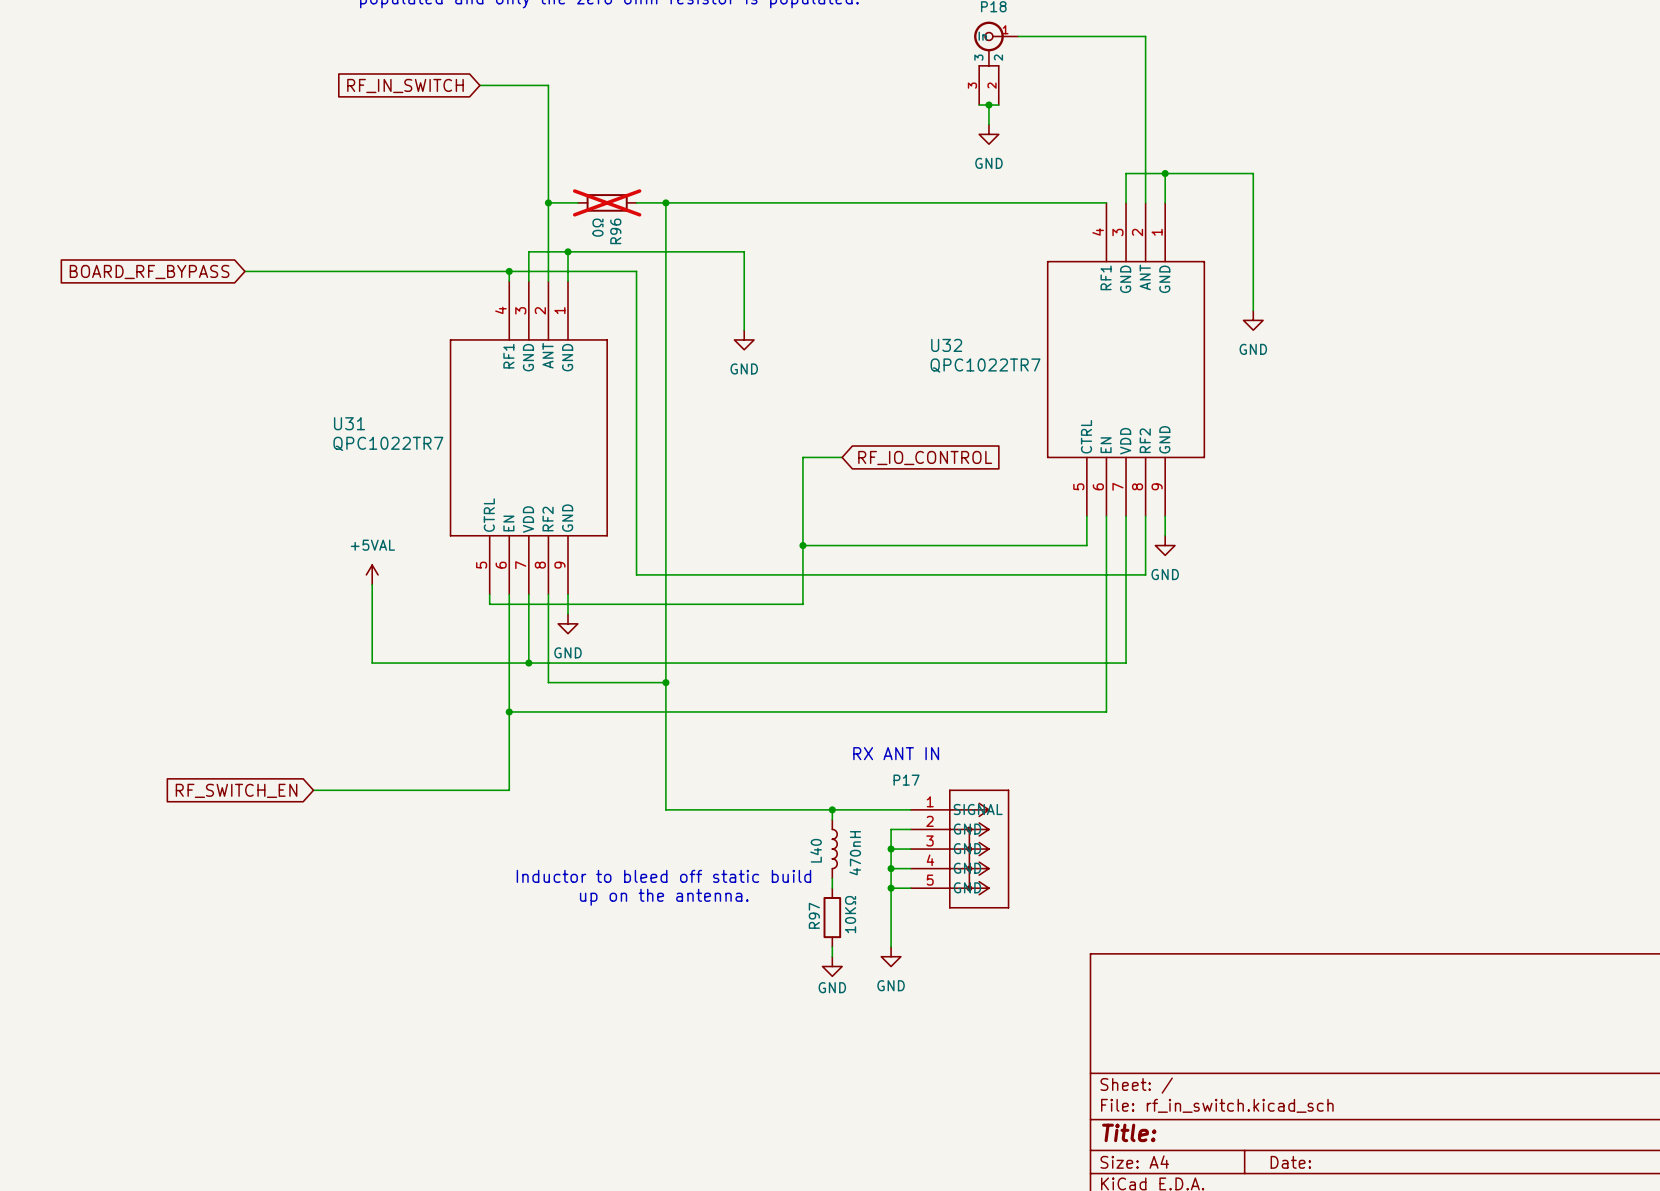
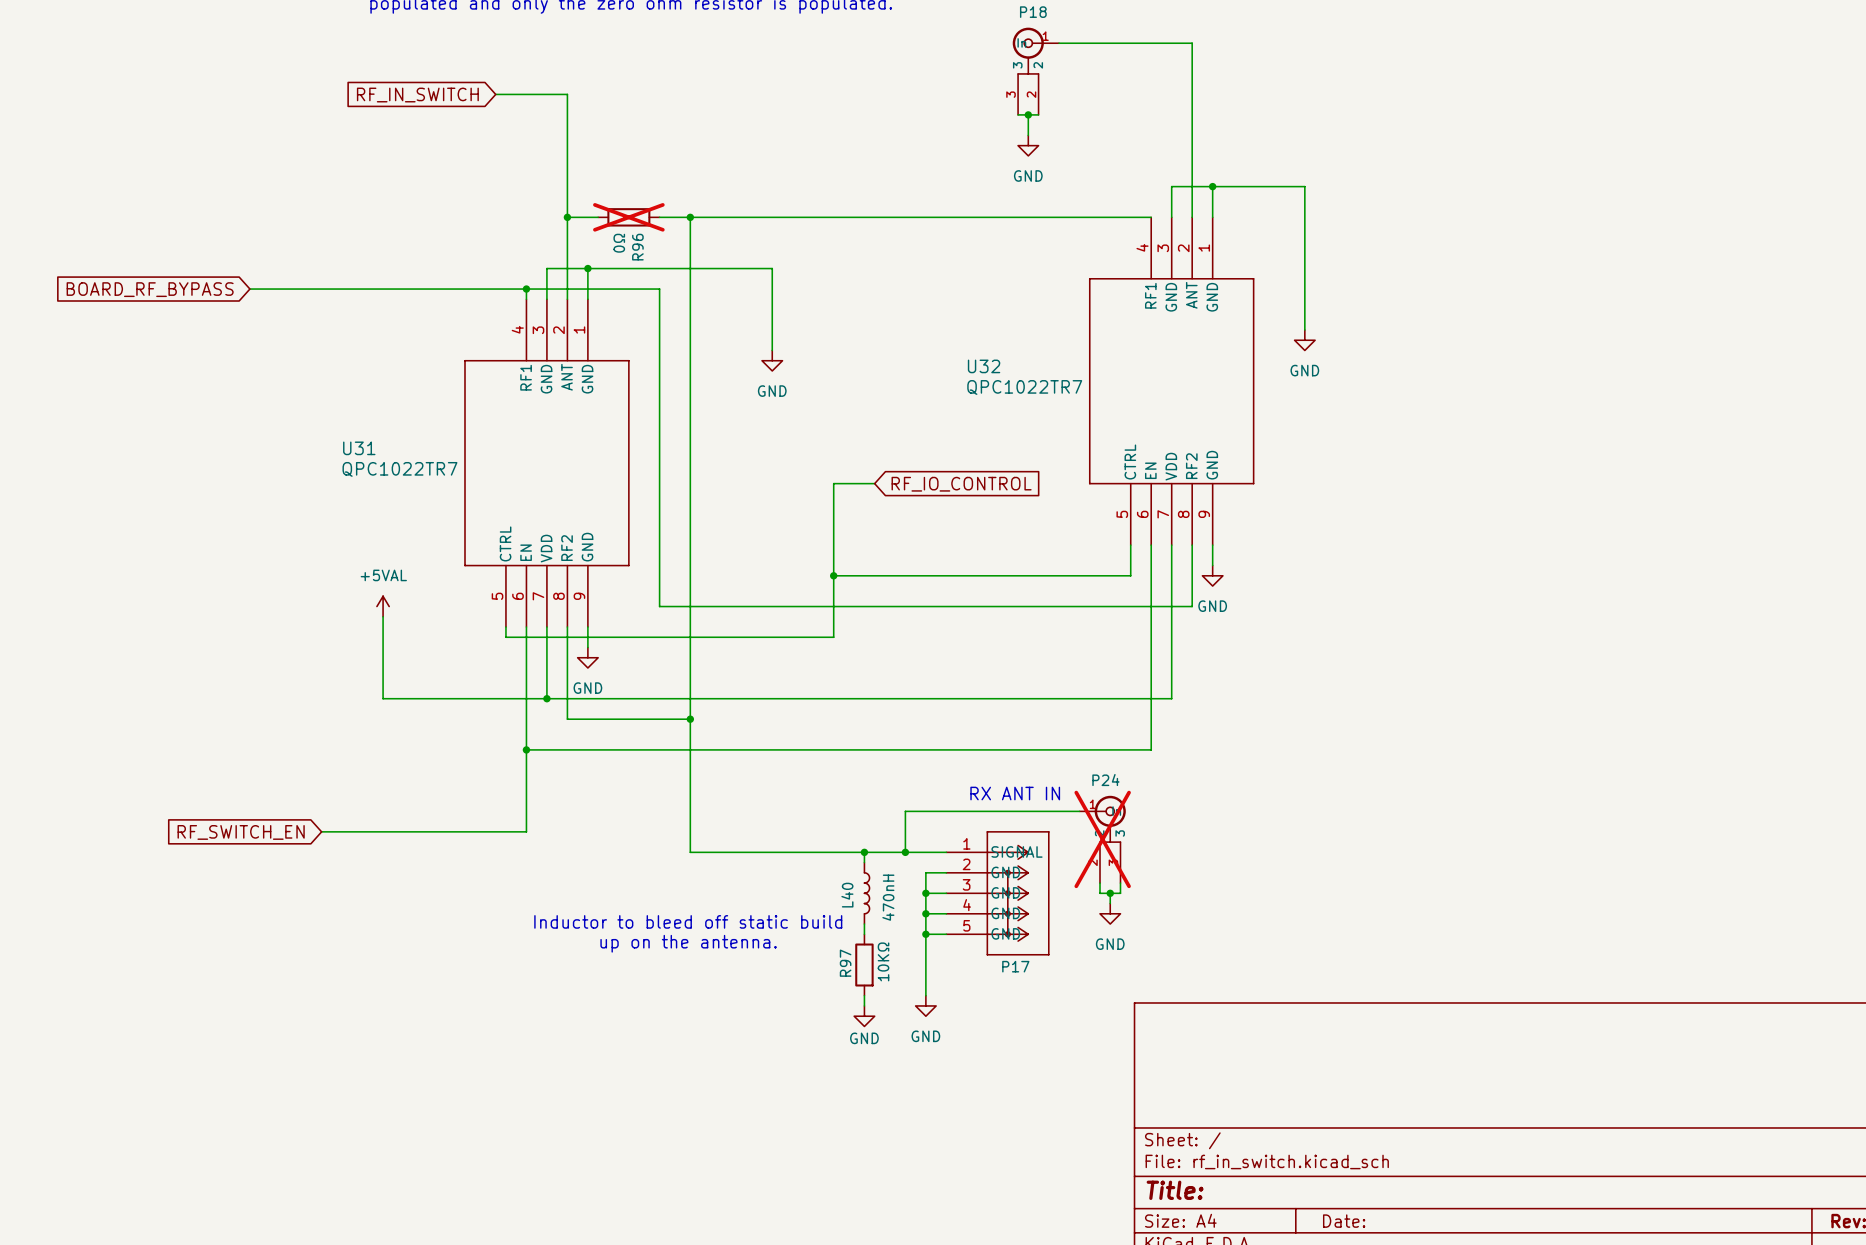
text position: RX ANT IN (896, 753) -> RX ANT IN (1015, 793)
wire: none -> (1079, 811) (905, 811) (905, 852)
P17 name position: P17 (906, 780) -> P17 (1015, 966)
P24: none -> (1102, 839)
junction: none -> (905, 852)
wire: none -> (1100, 883) (1100, 893) (1120, 893) (1120, 883)
wire: none -> (1110, 893) (1110, 903)
junction: none -> (1110, 893)
power symbol: none -> GND (1110, 913)

